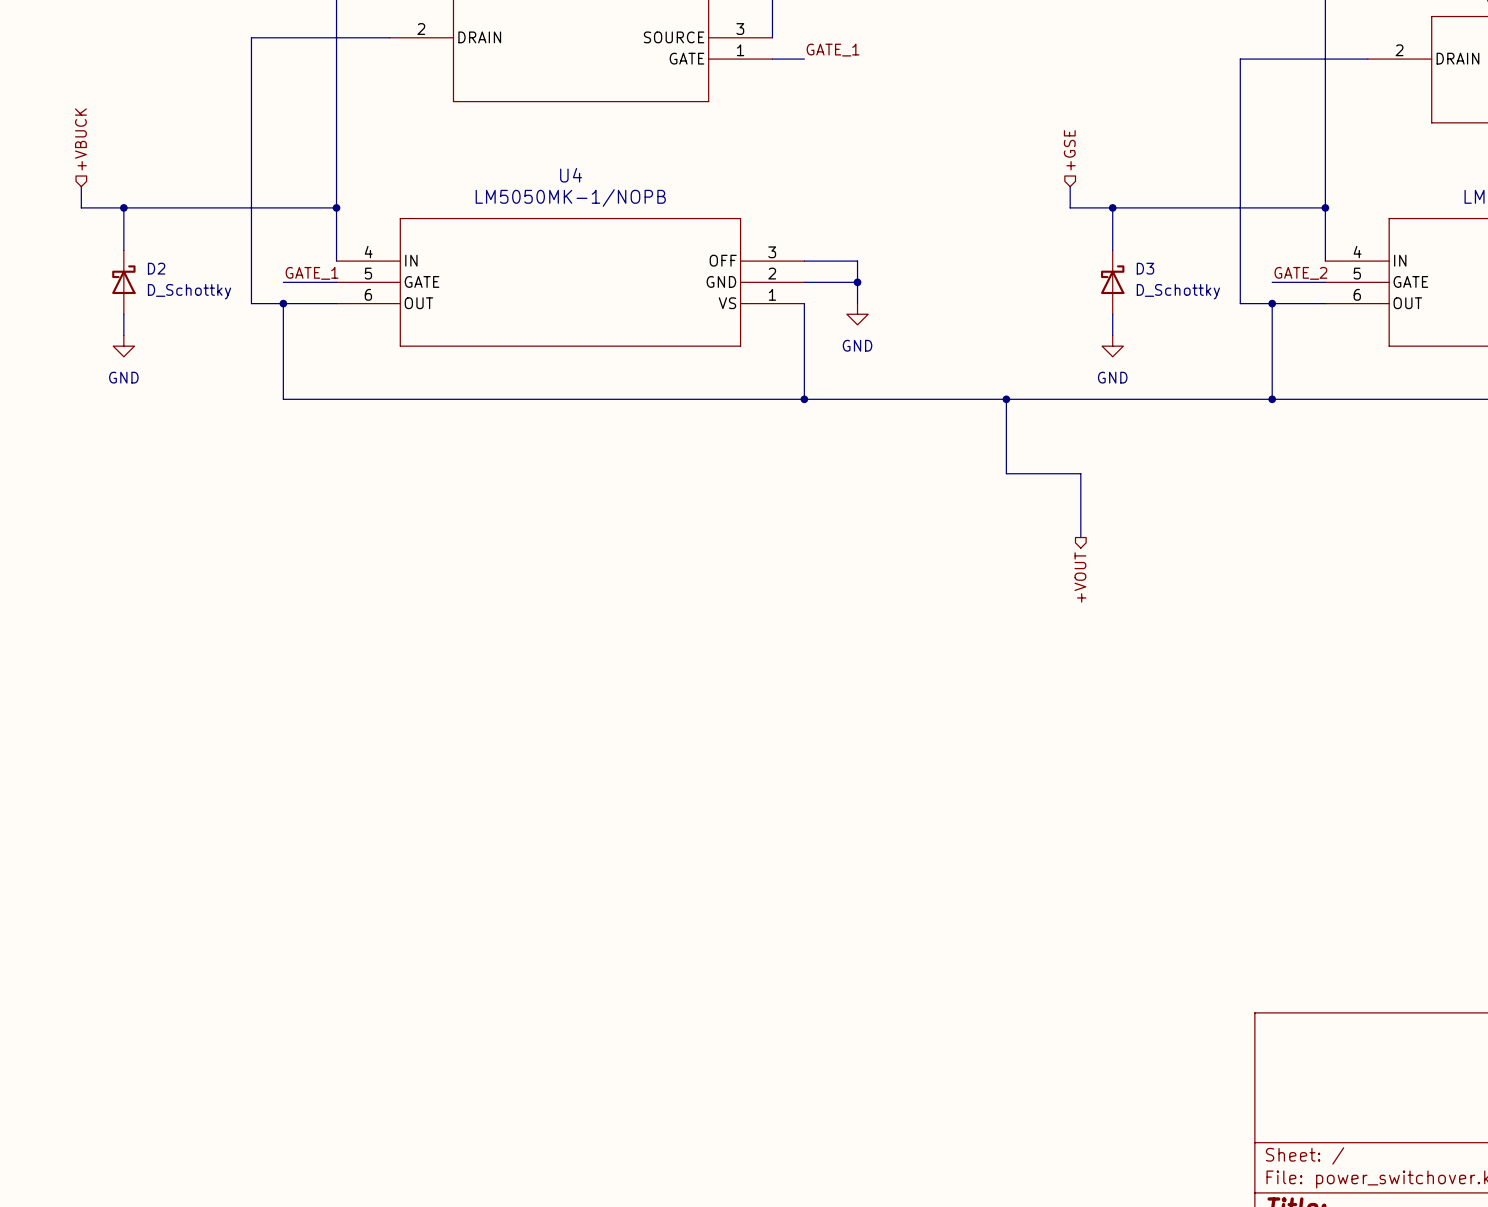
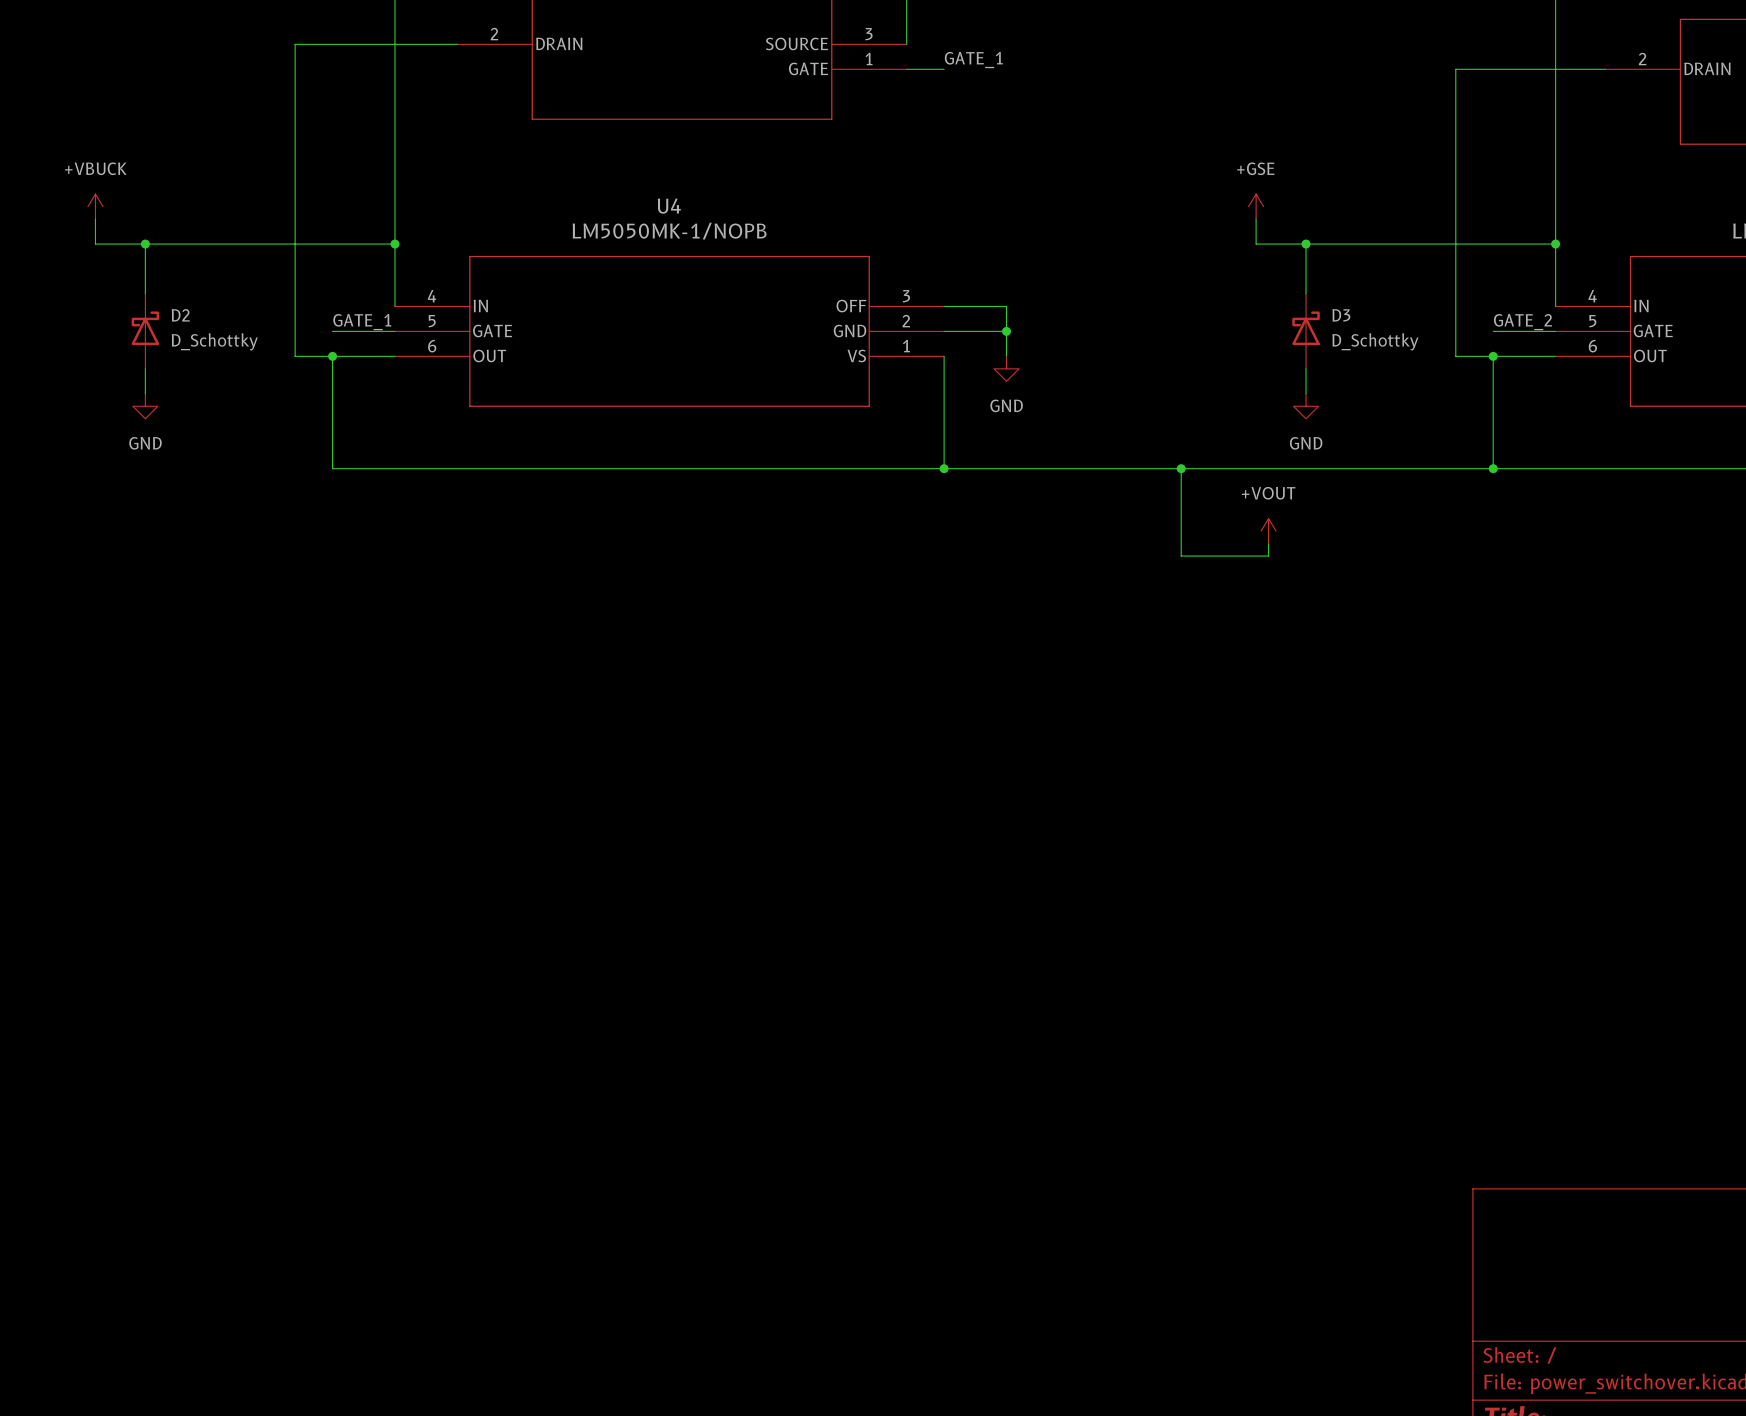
hierarchical label: +VBUCK (80, 139) -> none
hierarchical label: +GSE (1069, 150) -> none
power symbol: none -> +VBUCK (95, 206)
power symbol: none -> +GSE (1256, 206)
power symbol: none -> +VOUT (1268, 531)
wire: (1080, 473) (1080, 537) -> (1268, 556) (1268, 543)
hierarchical label: +VOUT (1080, 577) -> none

